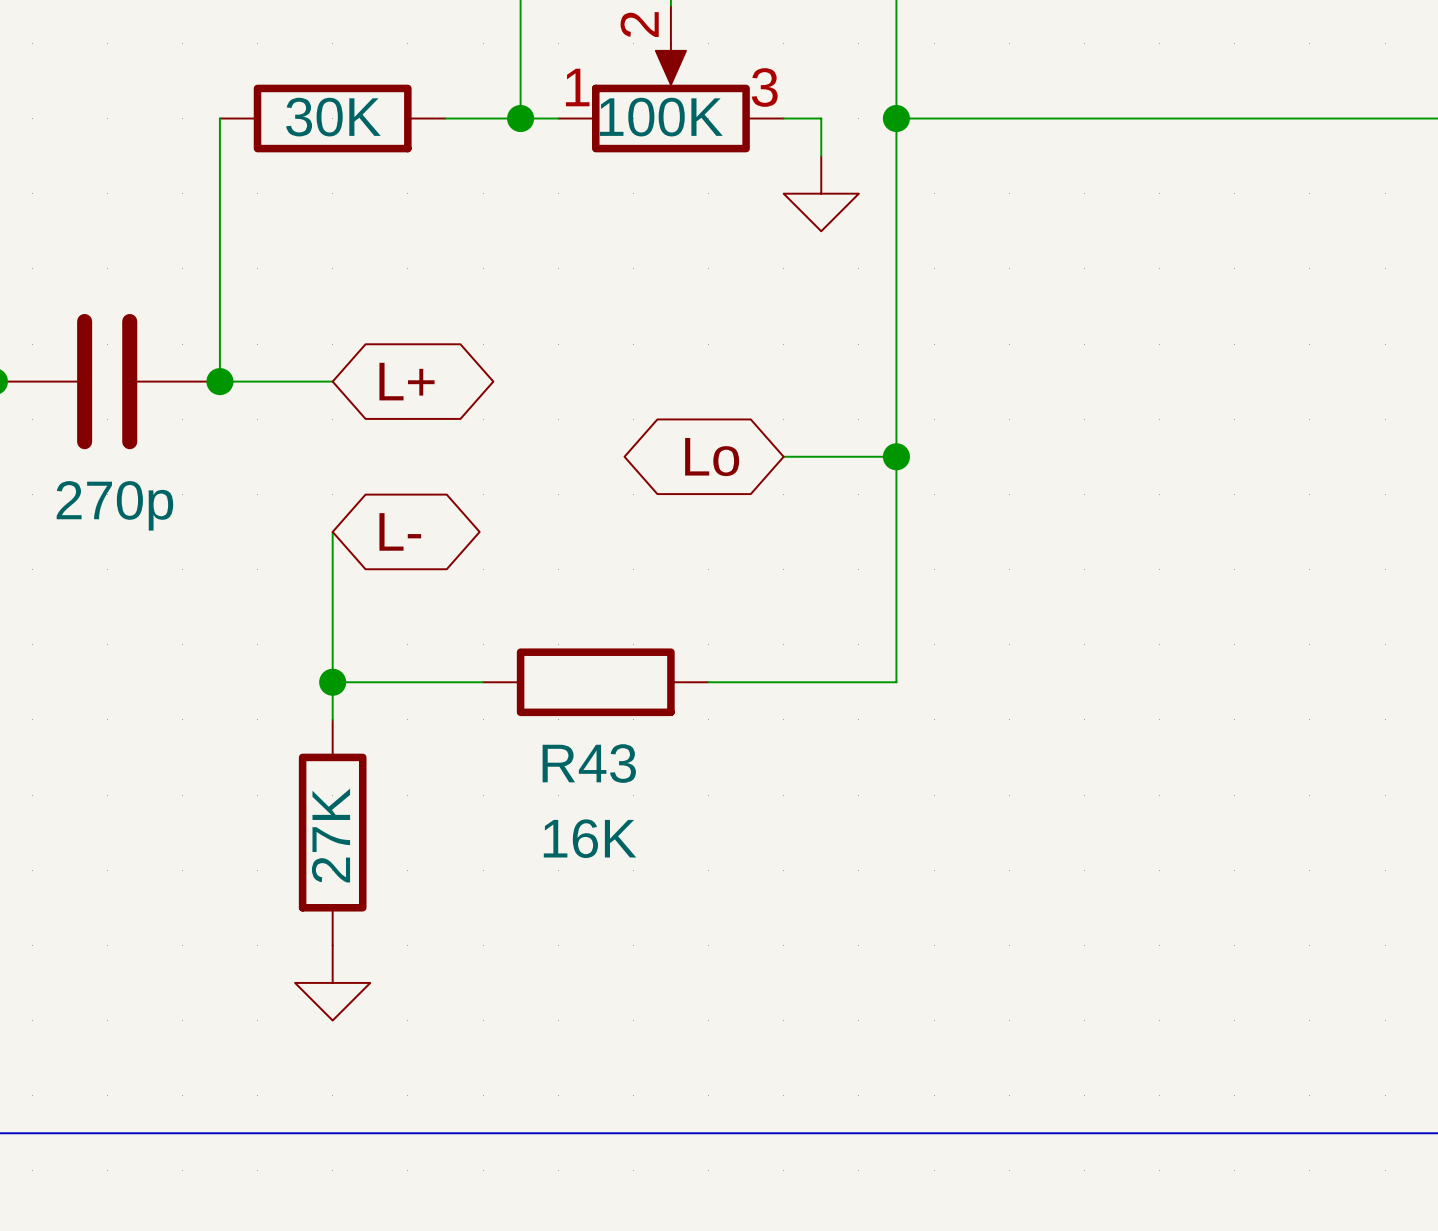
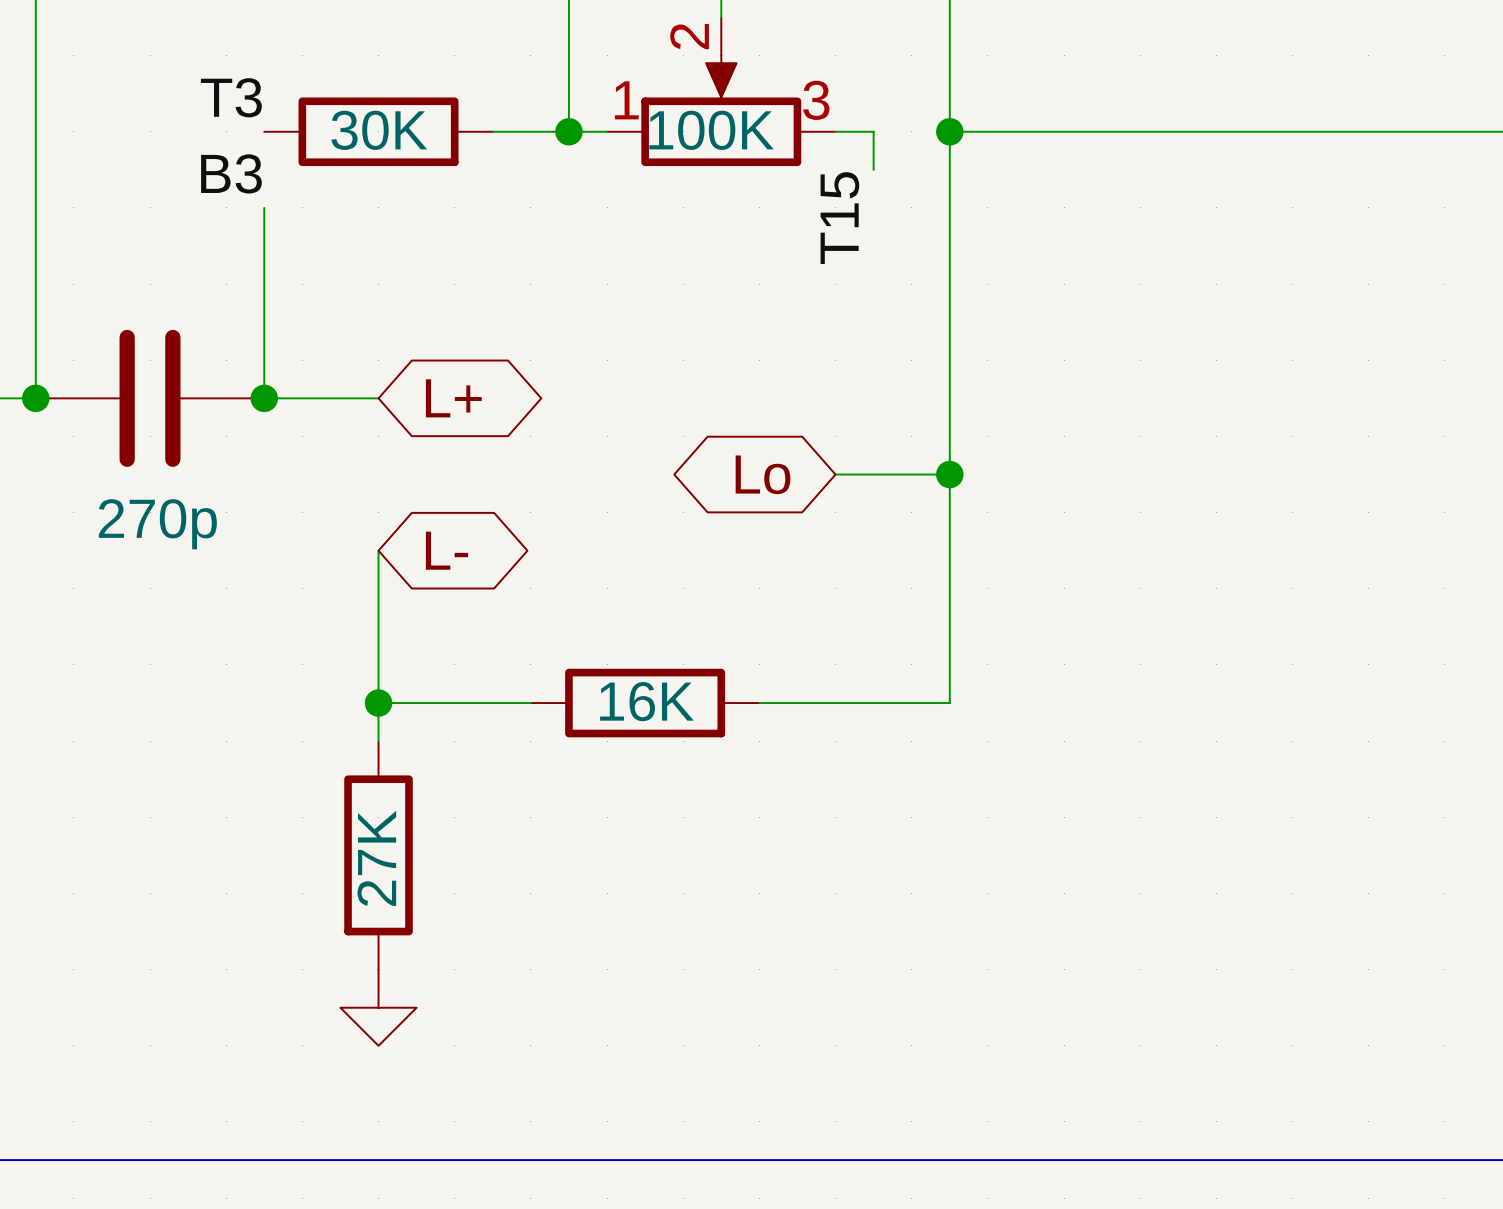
label: none -> T3 (231, 97)
wire: (219, 118) (219, 193) -> none
label: none -> B3 (231, 173)
power symbol: (821, 193) -> none
label: none -> T15 (839, 218)
R43 name: R43 (589, 763) -> none
R43 value position: 16K (590, 838) -> 16K (646, 701)

